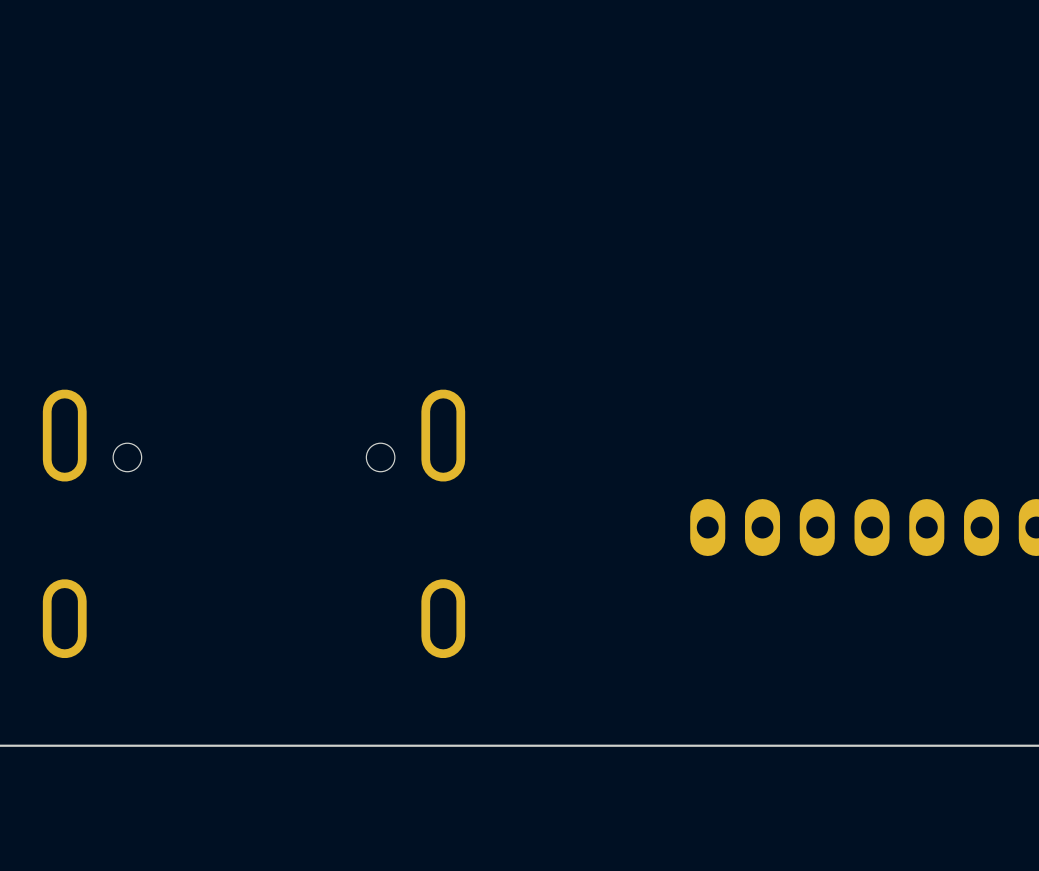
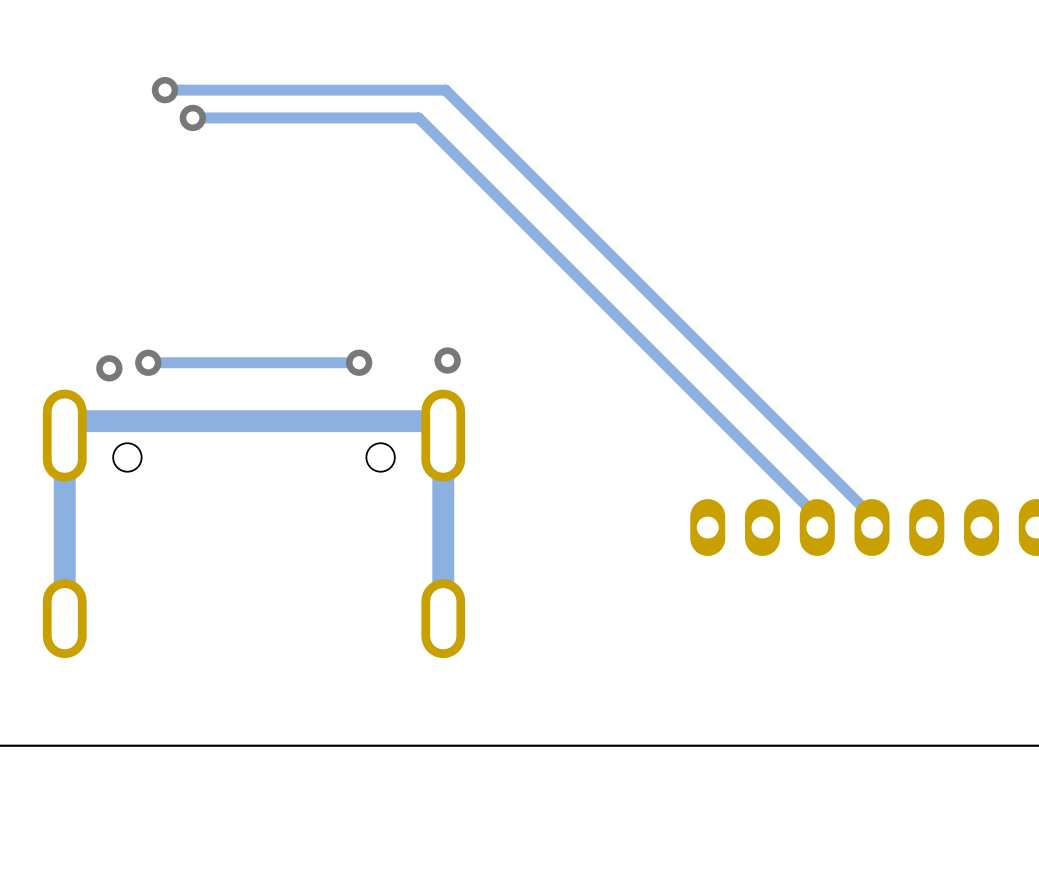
track: none -> (164, 90) (445, 90) (872, 516) (872, 527)
via: none -> (164, 90)
track: none -> (192, 117) (418, 117) (817, 516) (817, 527)
via: none -> (192, 117)
via: none -> (447, 360)
via: none -> (148, 362)
track: none -> (359, 362) (148, 362)
via: none -> (359, 362)
via: none -> (109, 368)
track: none -> (443, 618) (443, 435) (428, 421) (79, 421) (64, 435) (64, 618)

